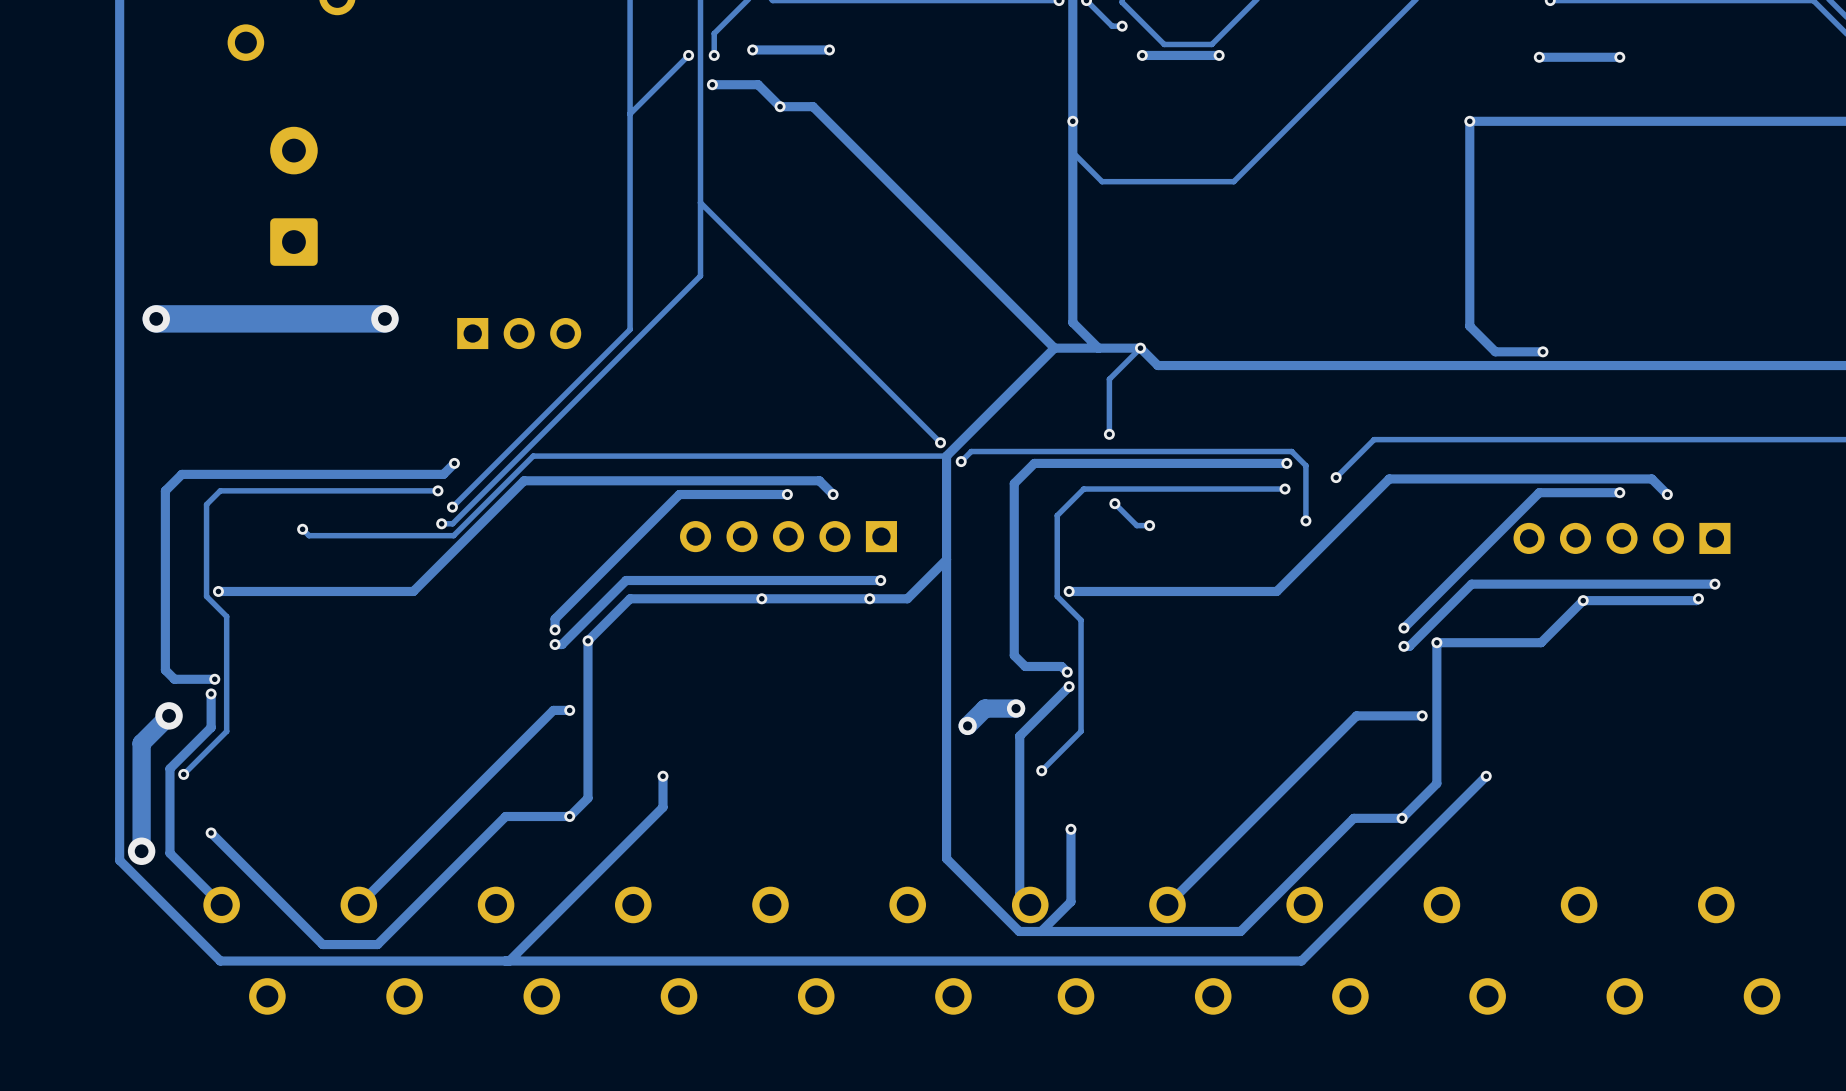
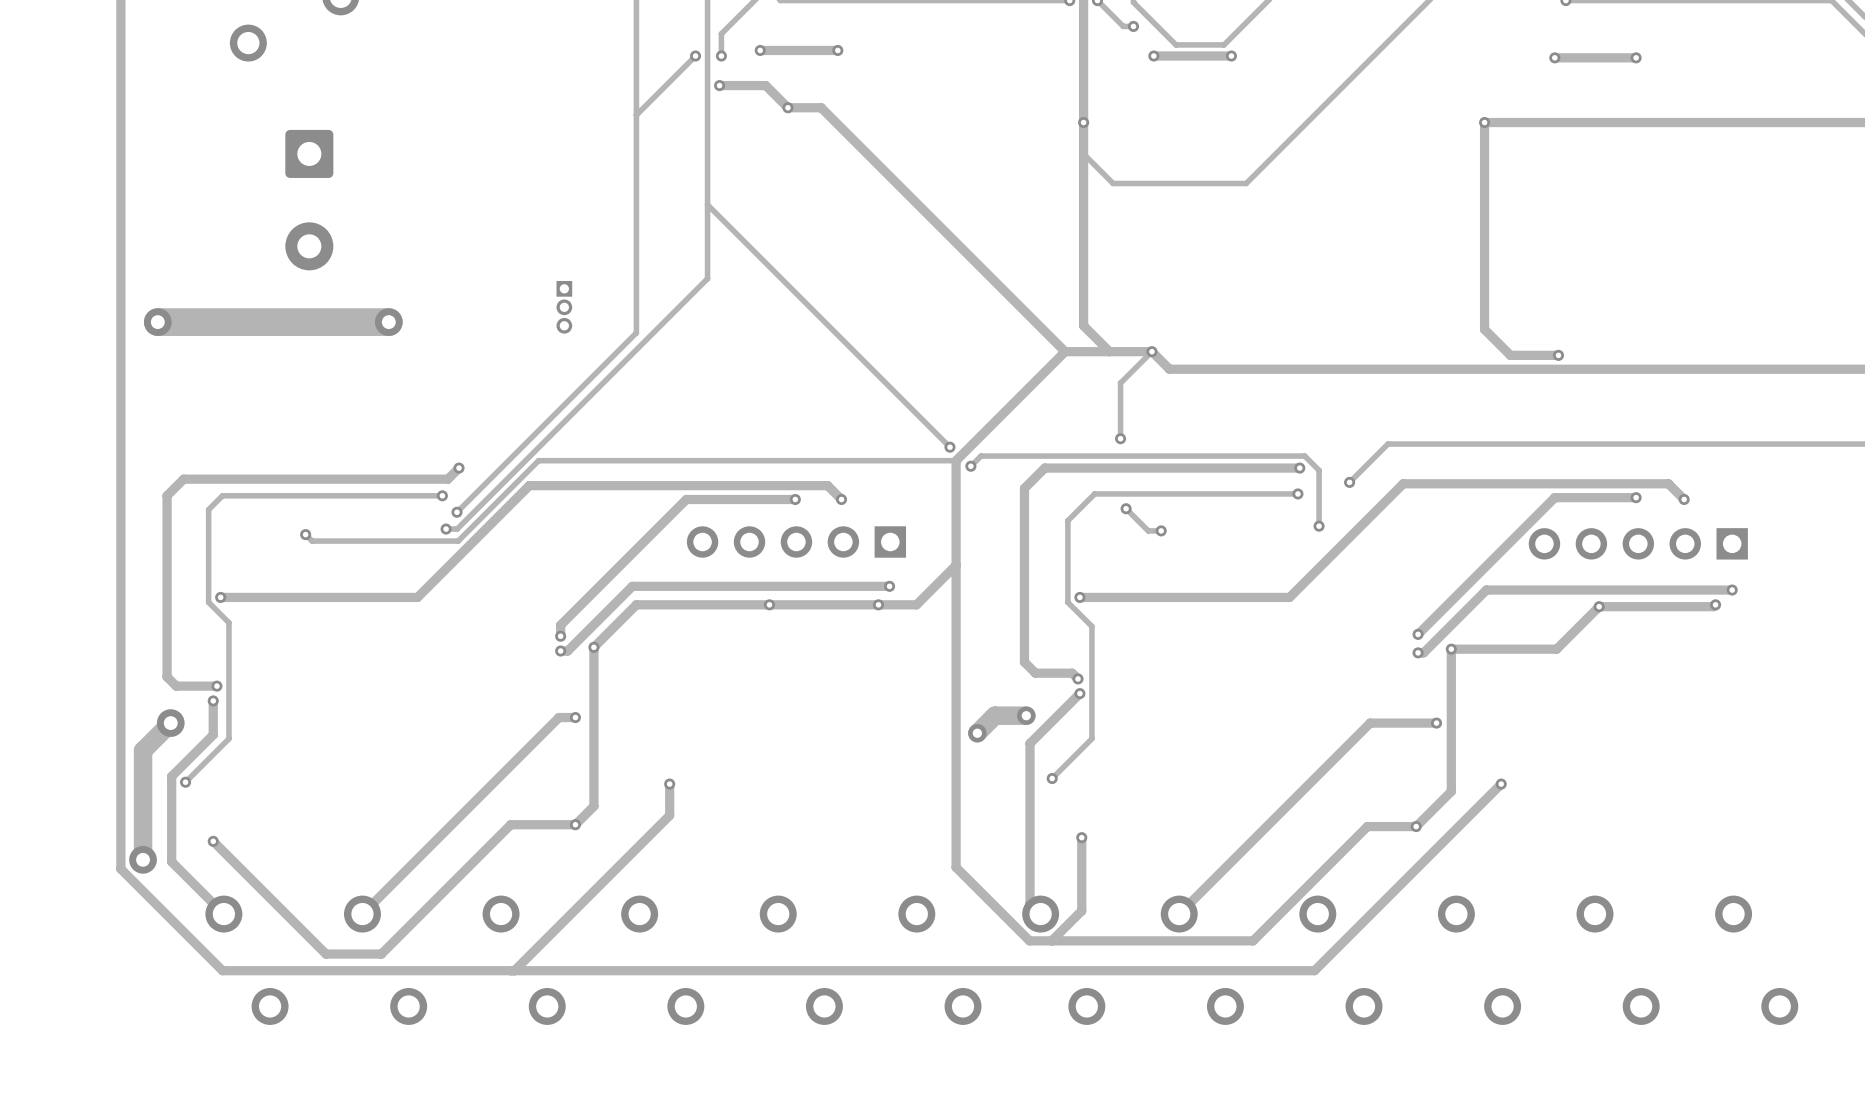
part rotation: 0° (293, 196) -> 180° (309, 200)
part: none -> (564, 307)
part: (519, 333) -> none

